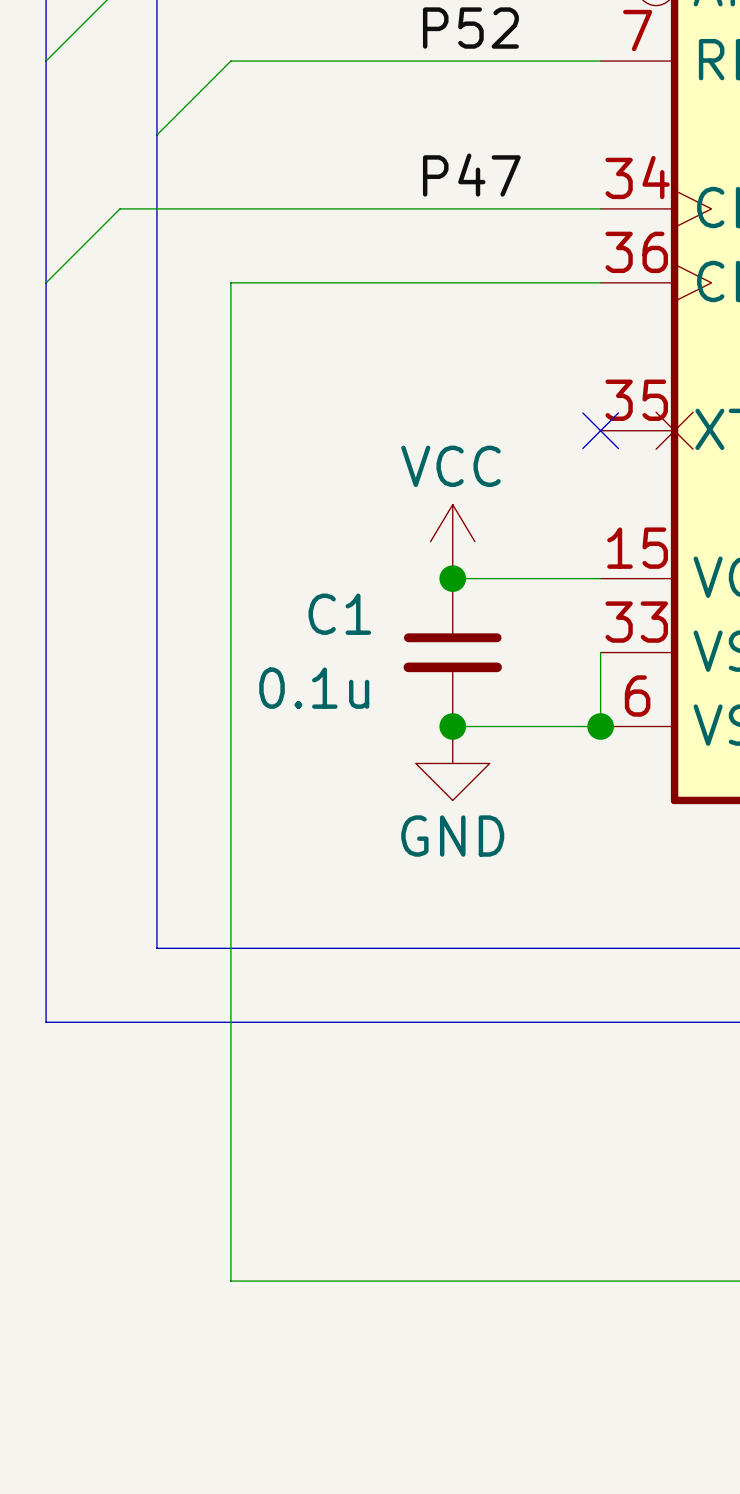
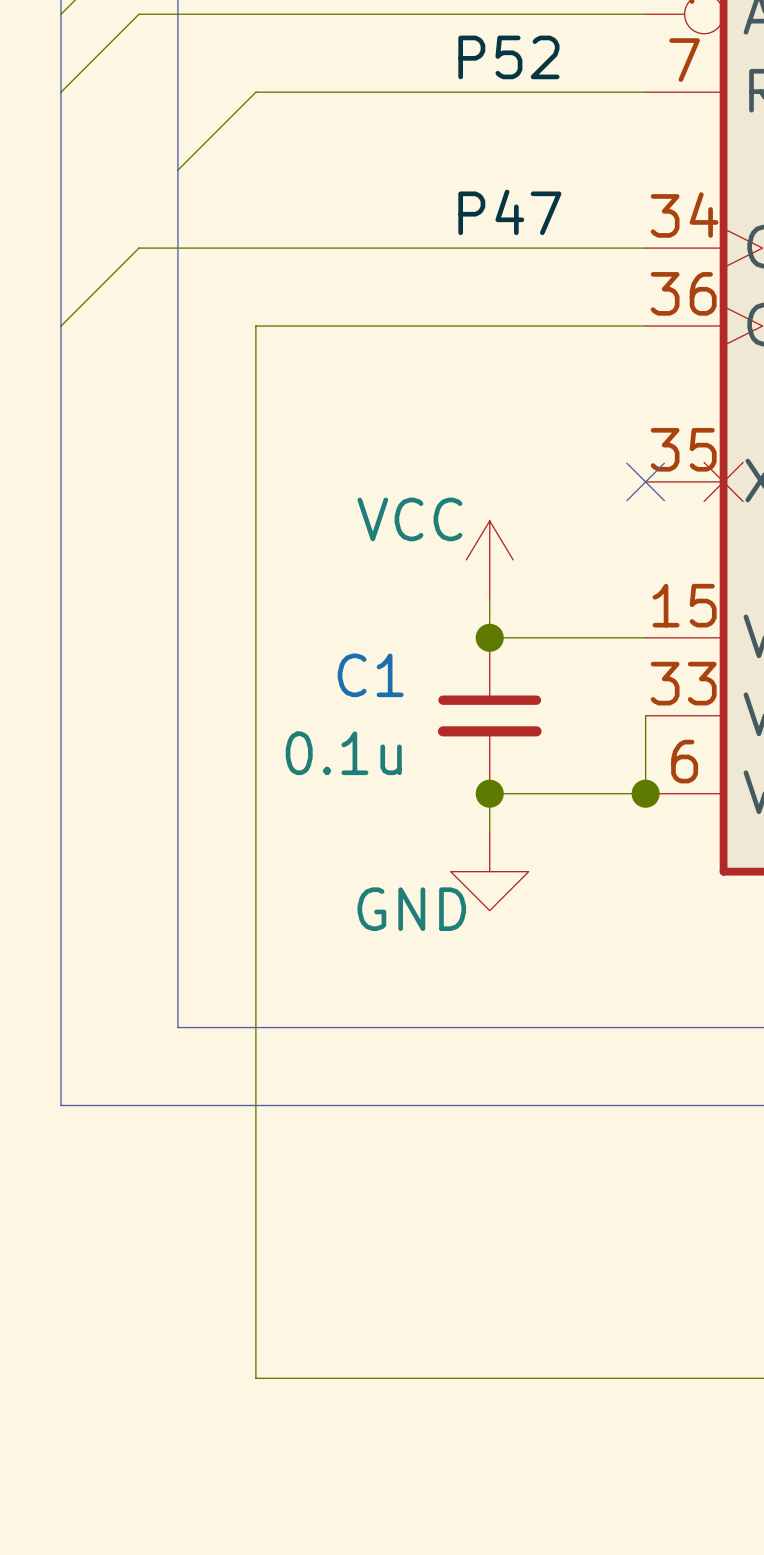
power symbol text position: VCC (450, 466) -> VCC (409, 519)
power symbol position: VCC (452, 541) -> VCC (489, 559)
power symbol position: GND (452, 763) -> GND (489, 871)
power symbol text position: GND (452, 836) -> GND (411, 909)

